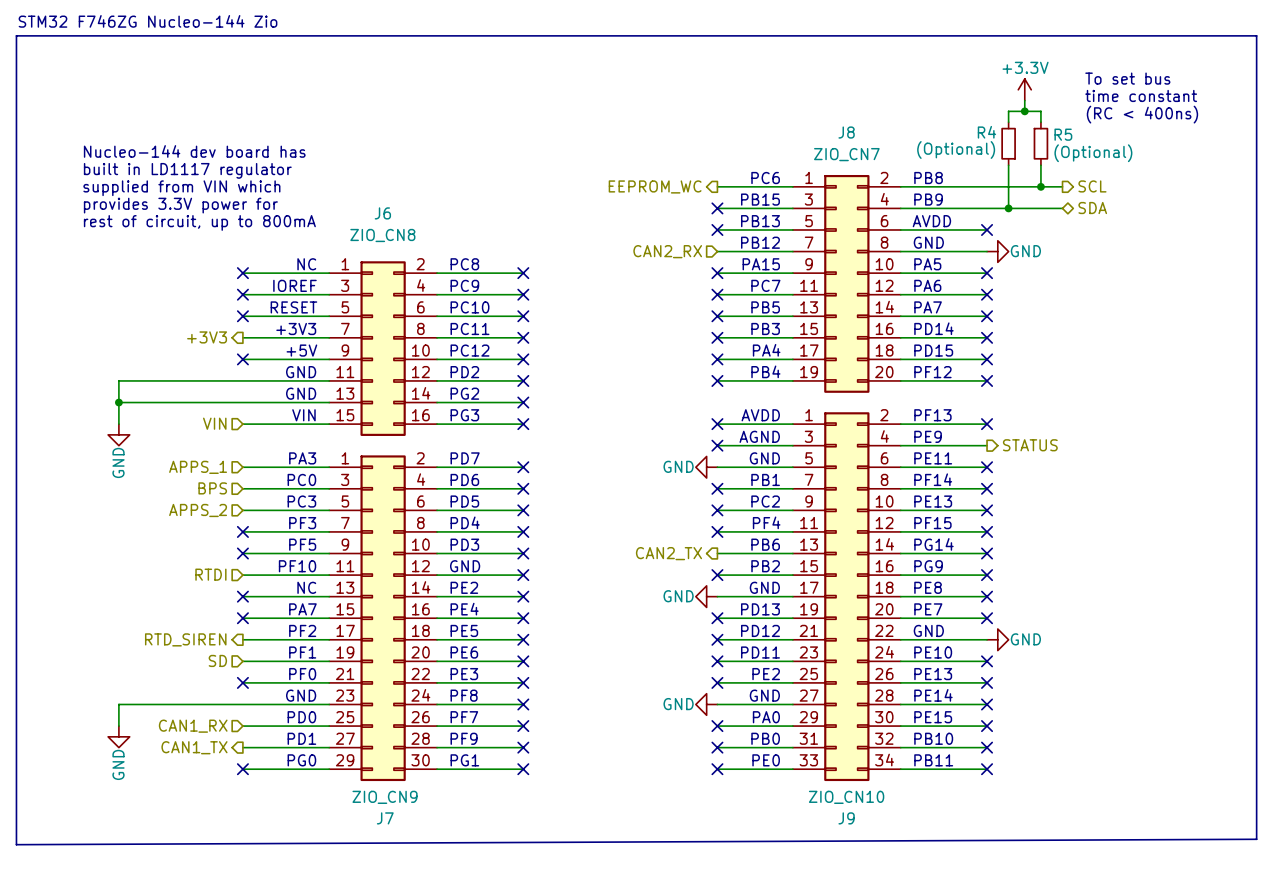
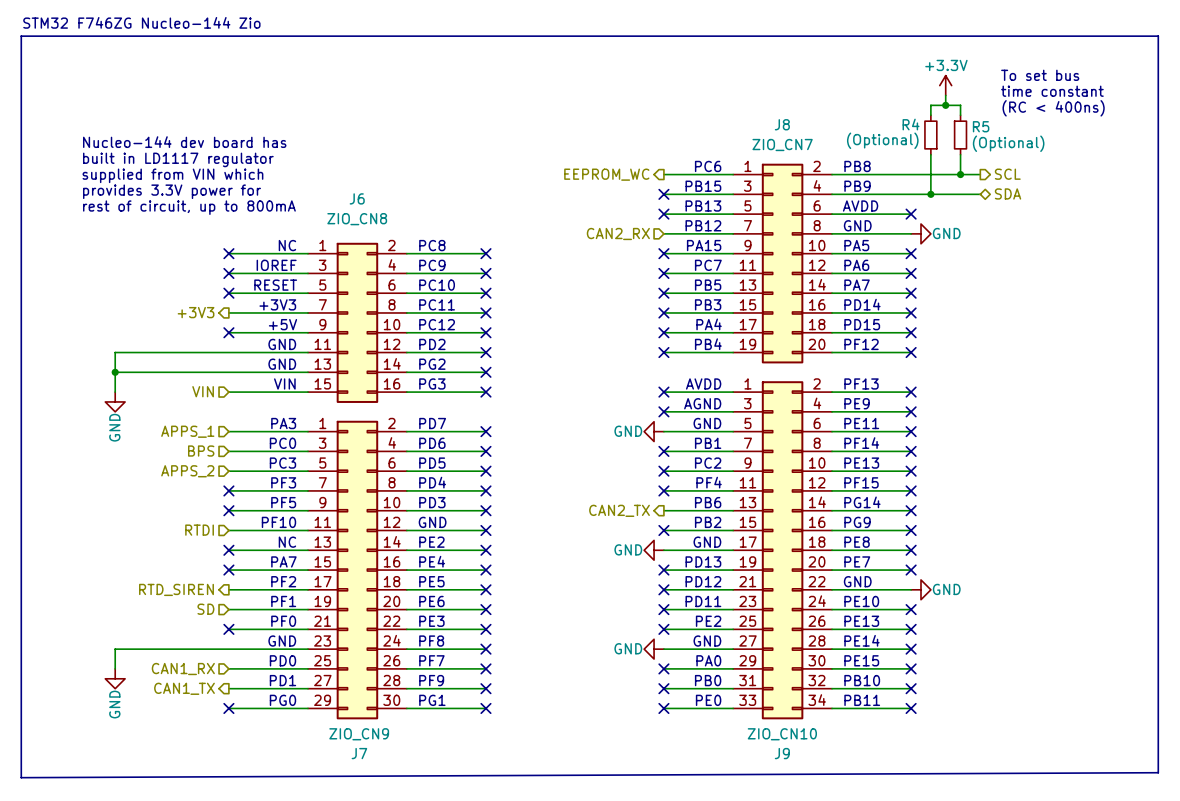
no-connect mark: none -> (911, 411)
hierarchical label: STATUS (1030, 445) -> none

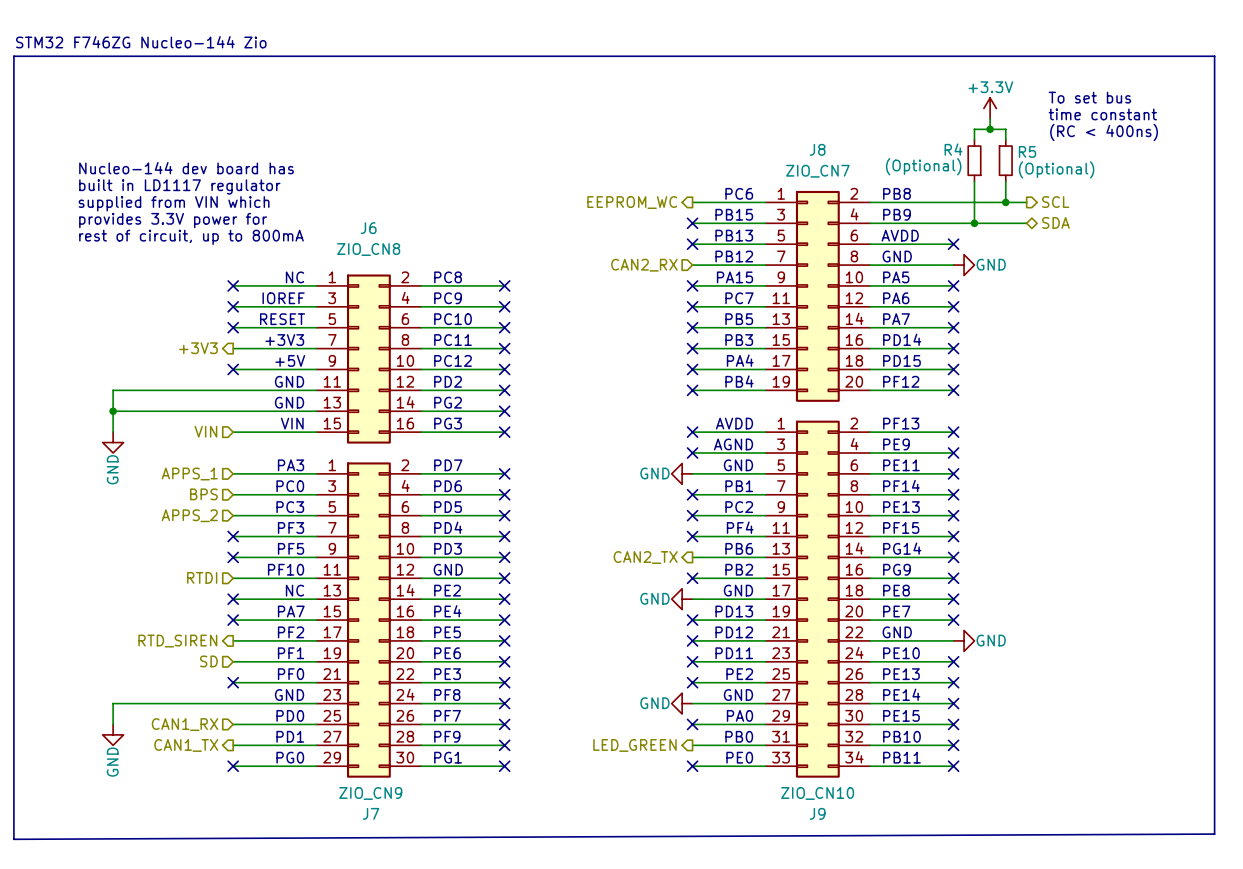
hierarchical label: none -> LED_GREEN (634, 745)
no-connect mark: (663, 688) -> none

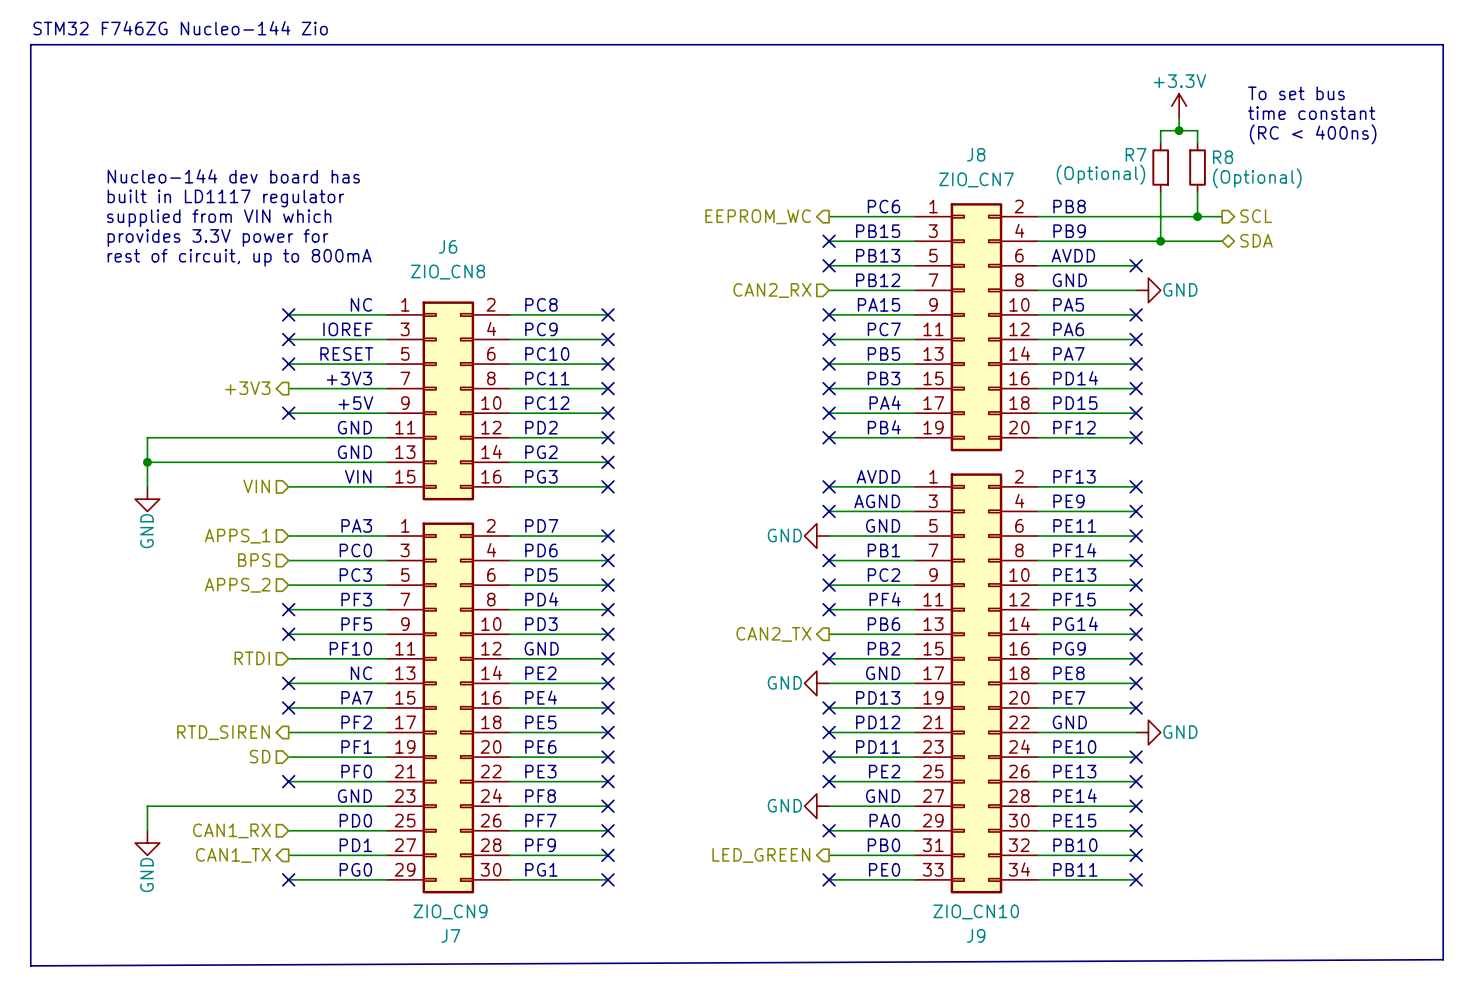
R4 name: R4 (953, 149) -> R7 (1136, 154)
R5 name: R5 (1027, 151) -> R8 (1223, 157)

